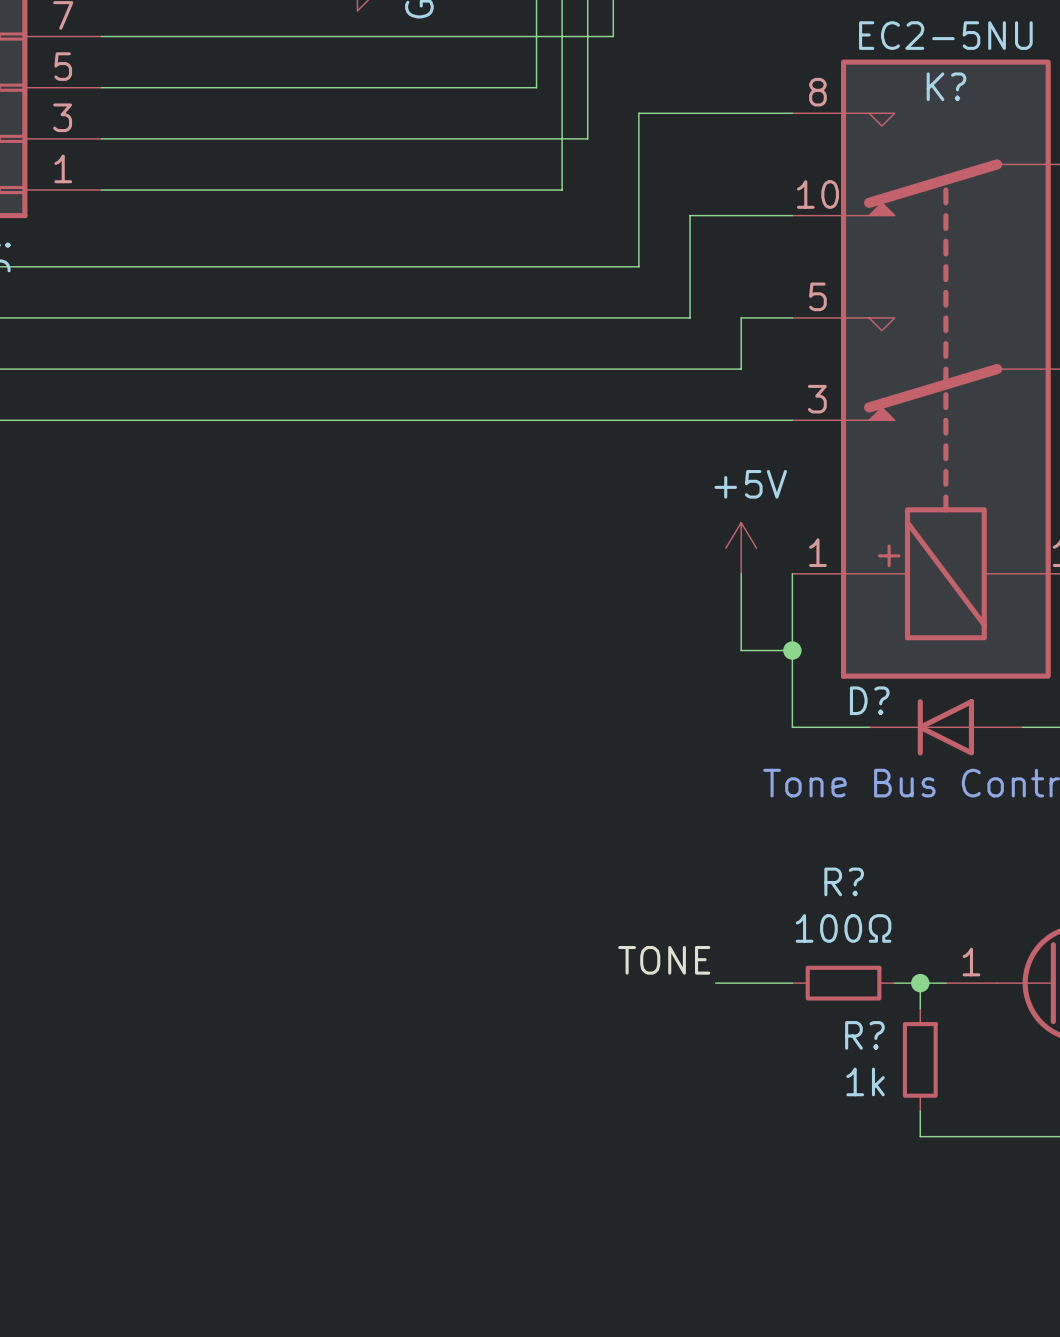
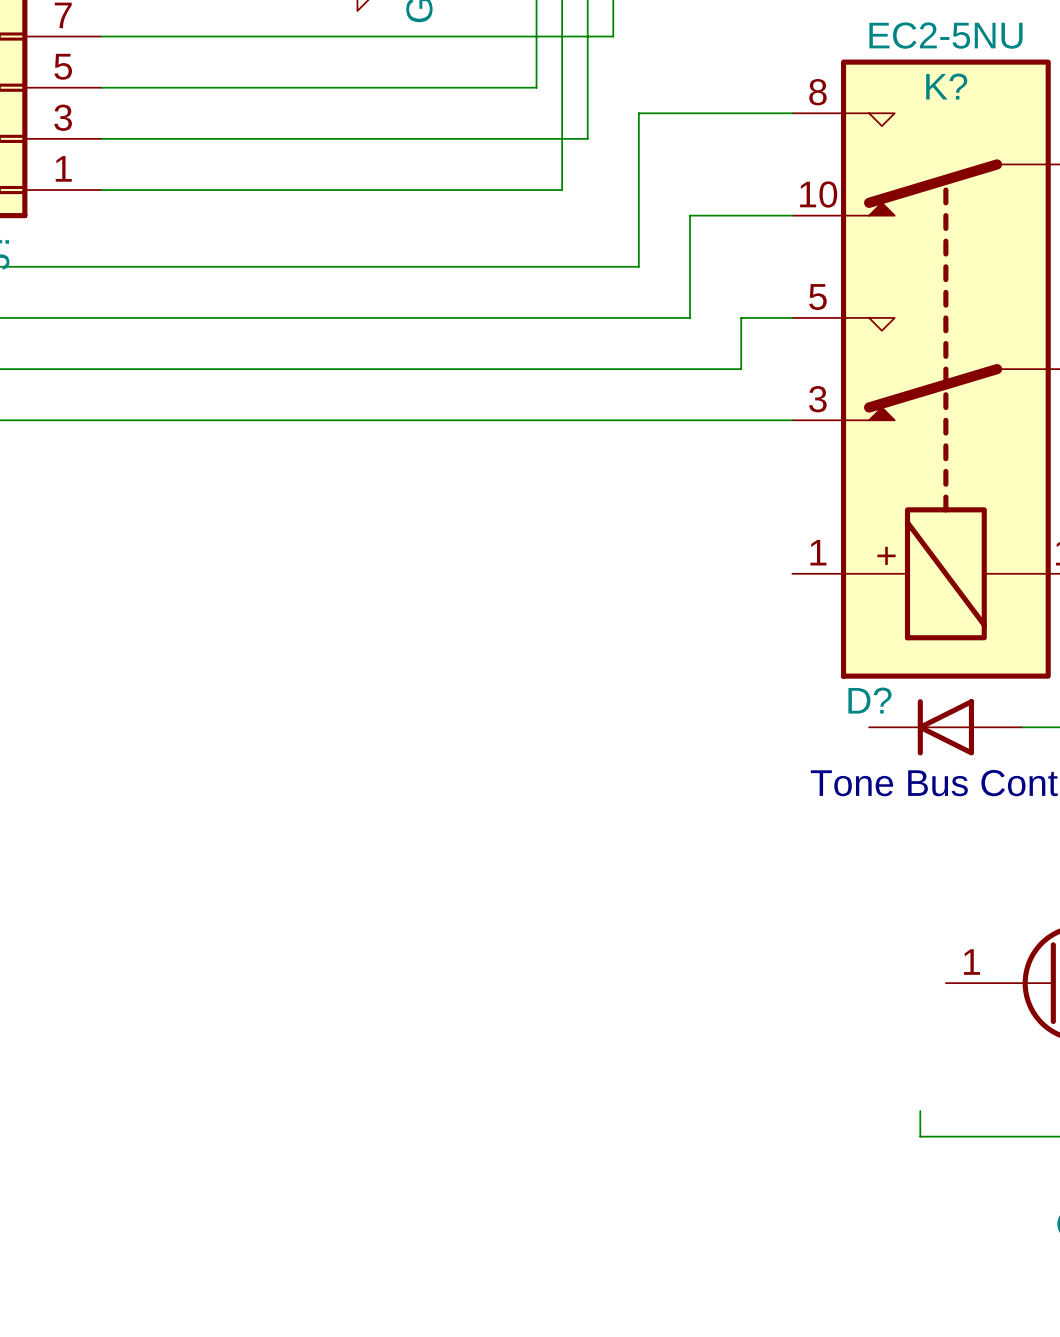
power symbol: +5V (741, 548) -> none
wire: (741, 573) (741, 650) (792, 650) -> none
wire: (792, 573) (792, 727) (869, 727) -> none
junction: (792, 650) -> none
label: TONE (664, 960) -> none
wire: (715, 983) (792, 983) -> none
R?: 100Ω (843, 983) -> none
wire: (894, 983) (945, 983) -> none
wire: (920, 983) (920, 1008) -> none
junction: (920, 983) -> none
R?: 1k (920, 1059) -> none

